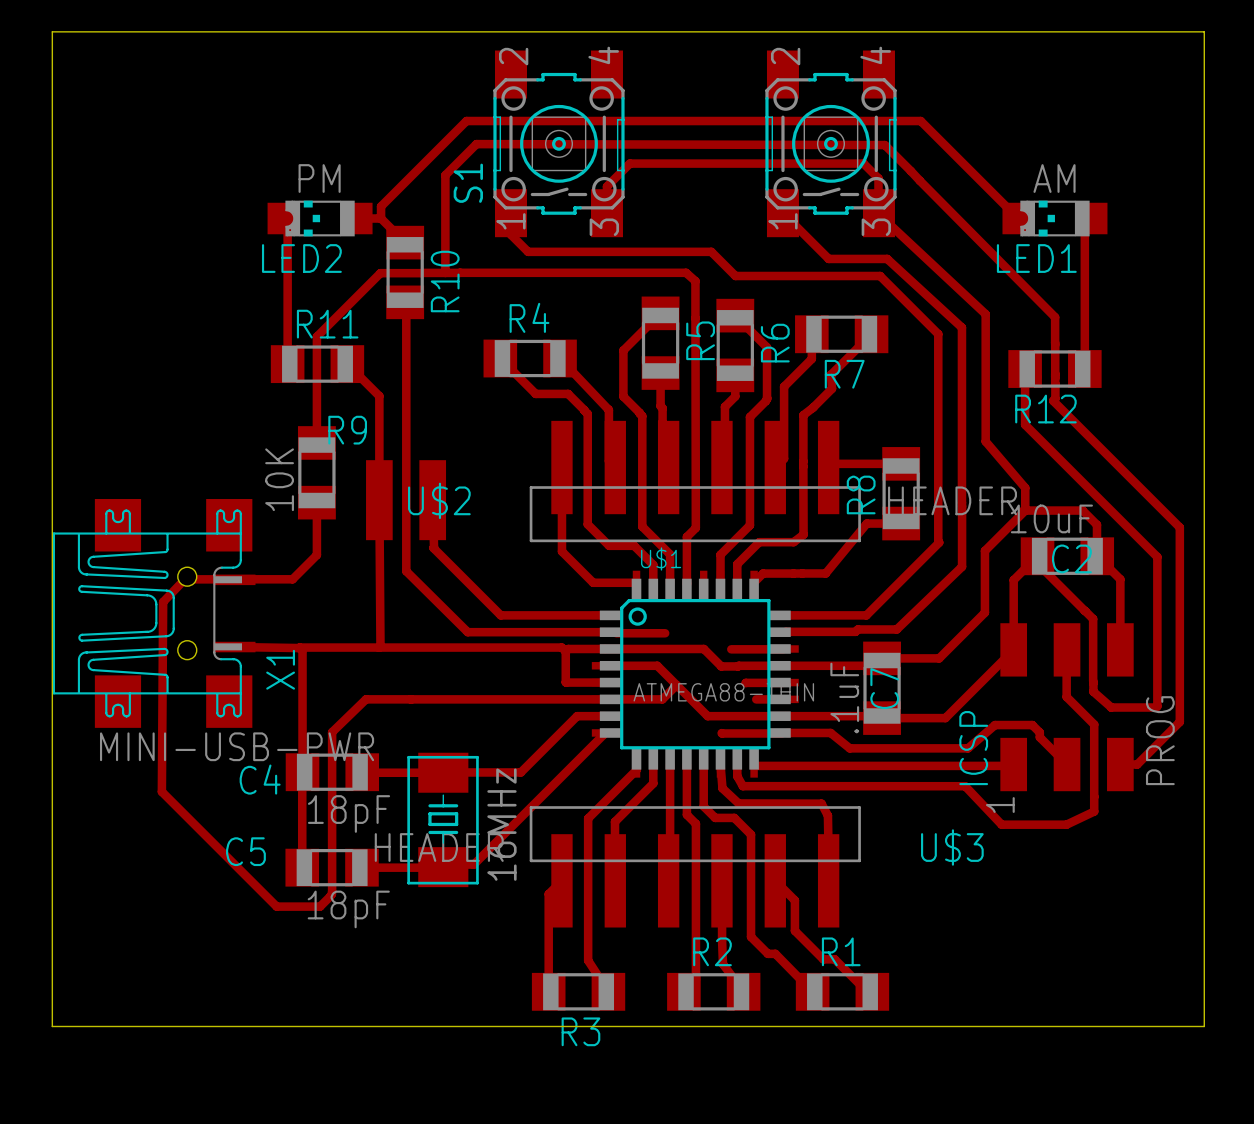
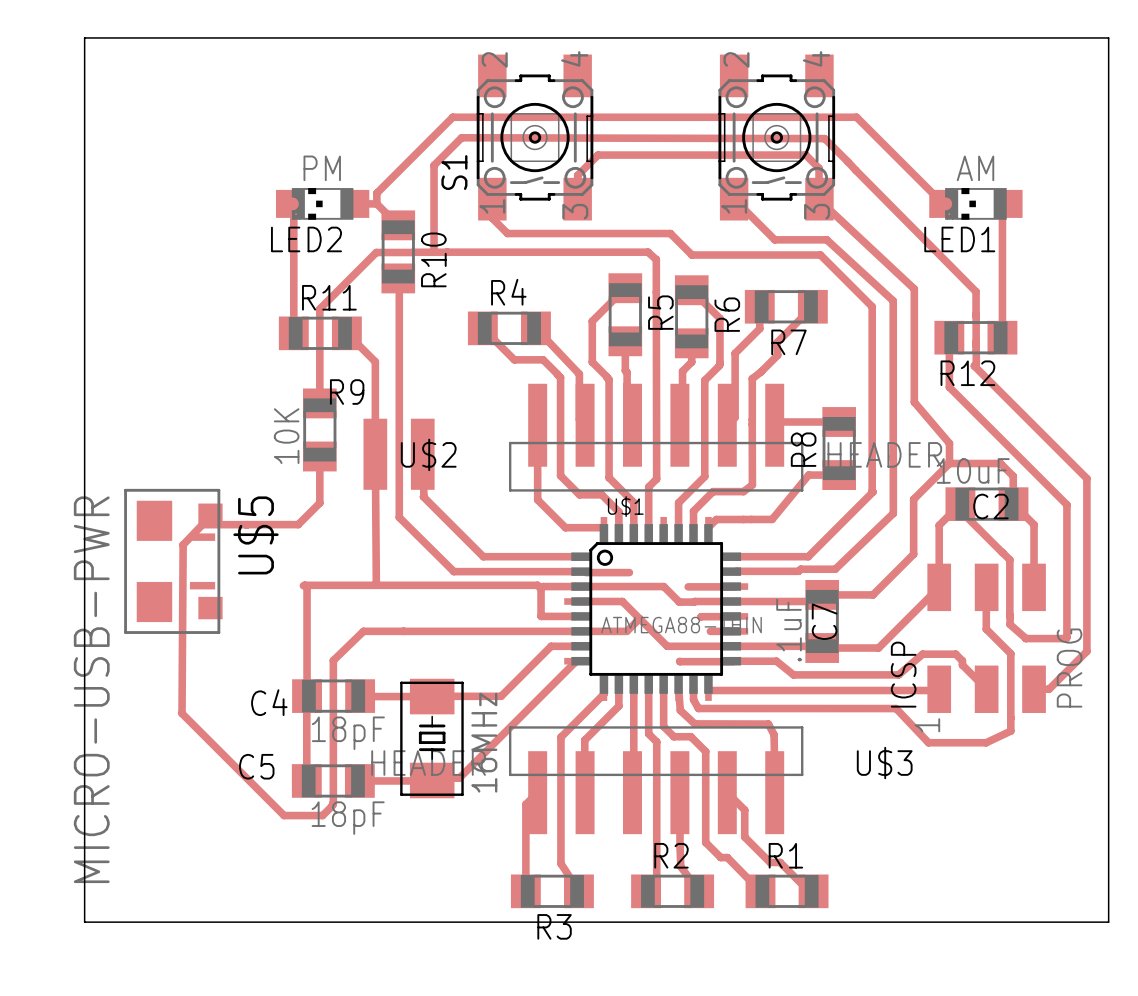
X1: MINI-USB-PWR (154, 613) -> none
U$5: none -> MICRO-USB-PWR (173, 561)
top track: (234, 647) (298, 648) -> none

